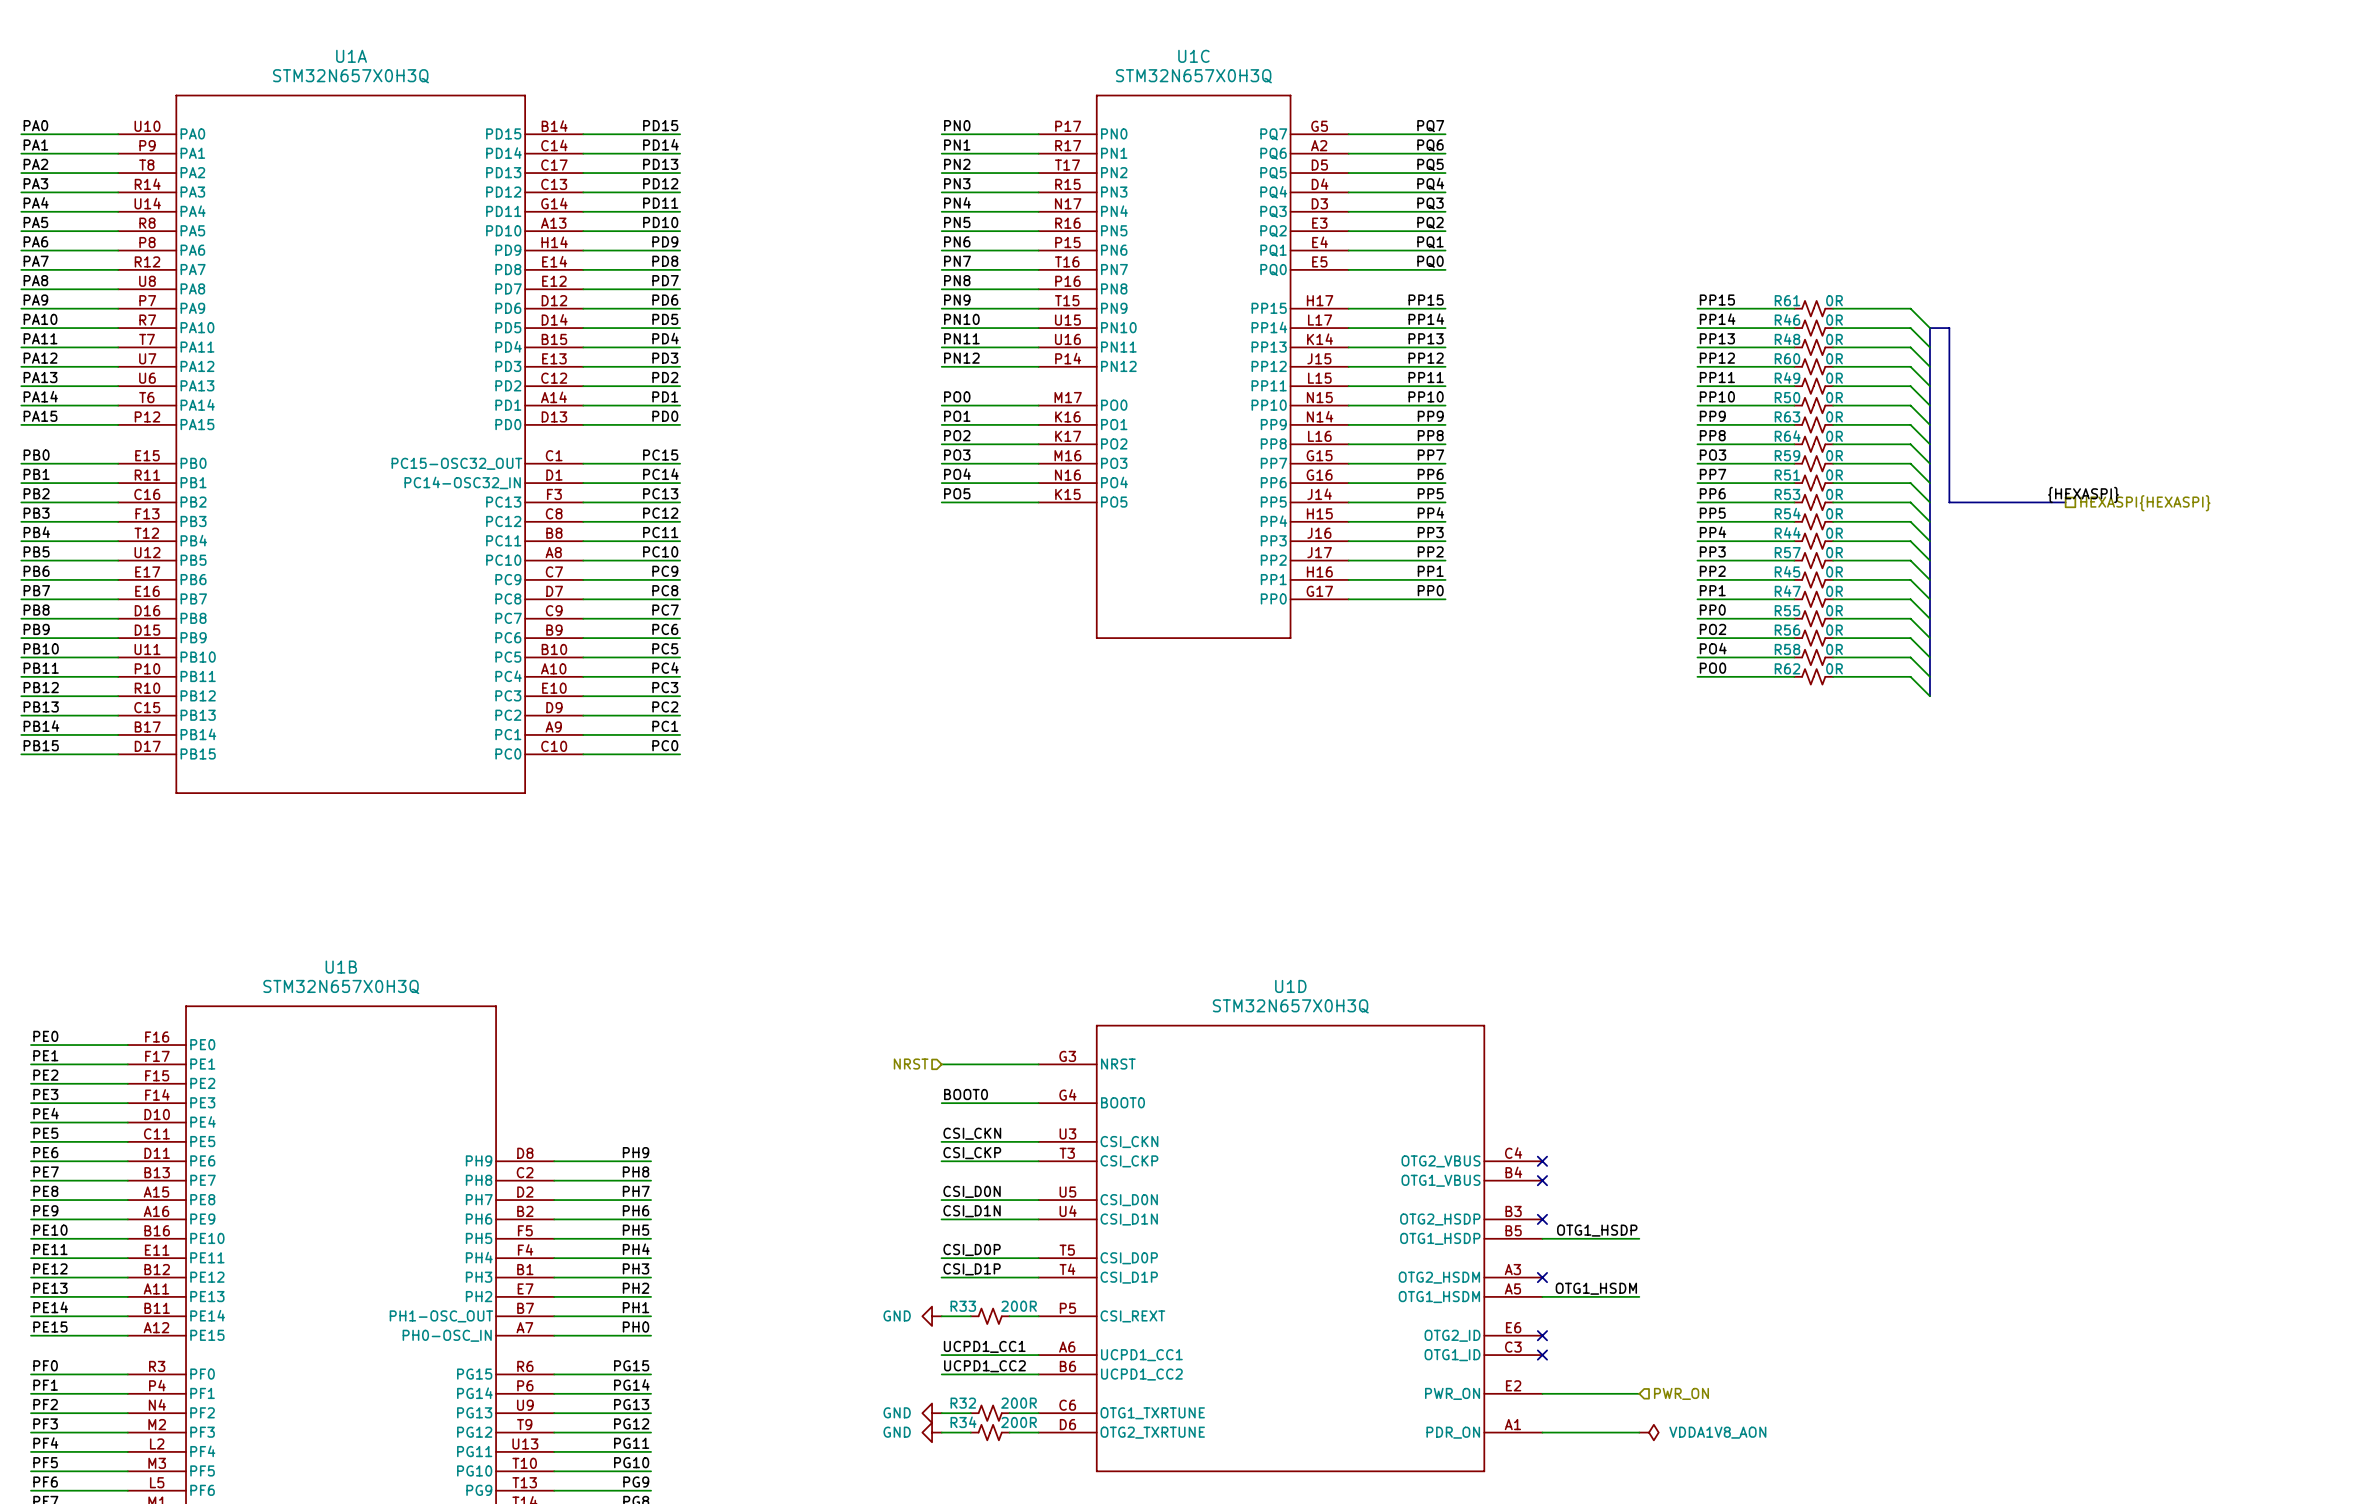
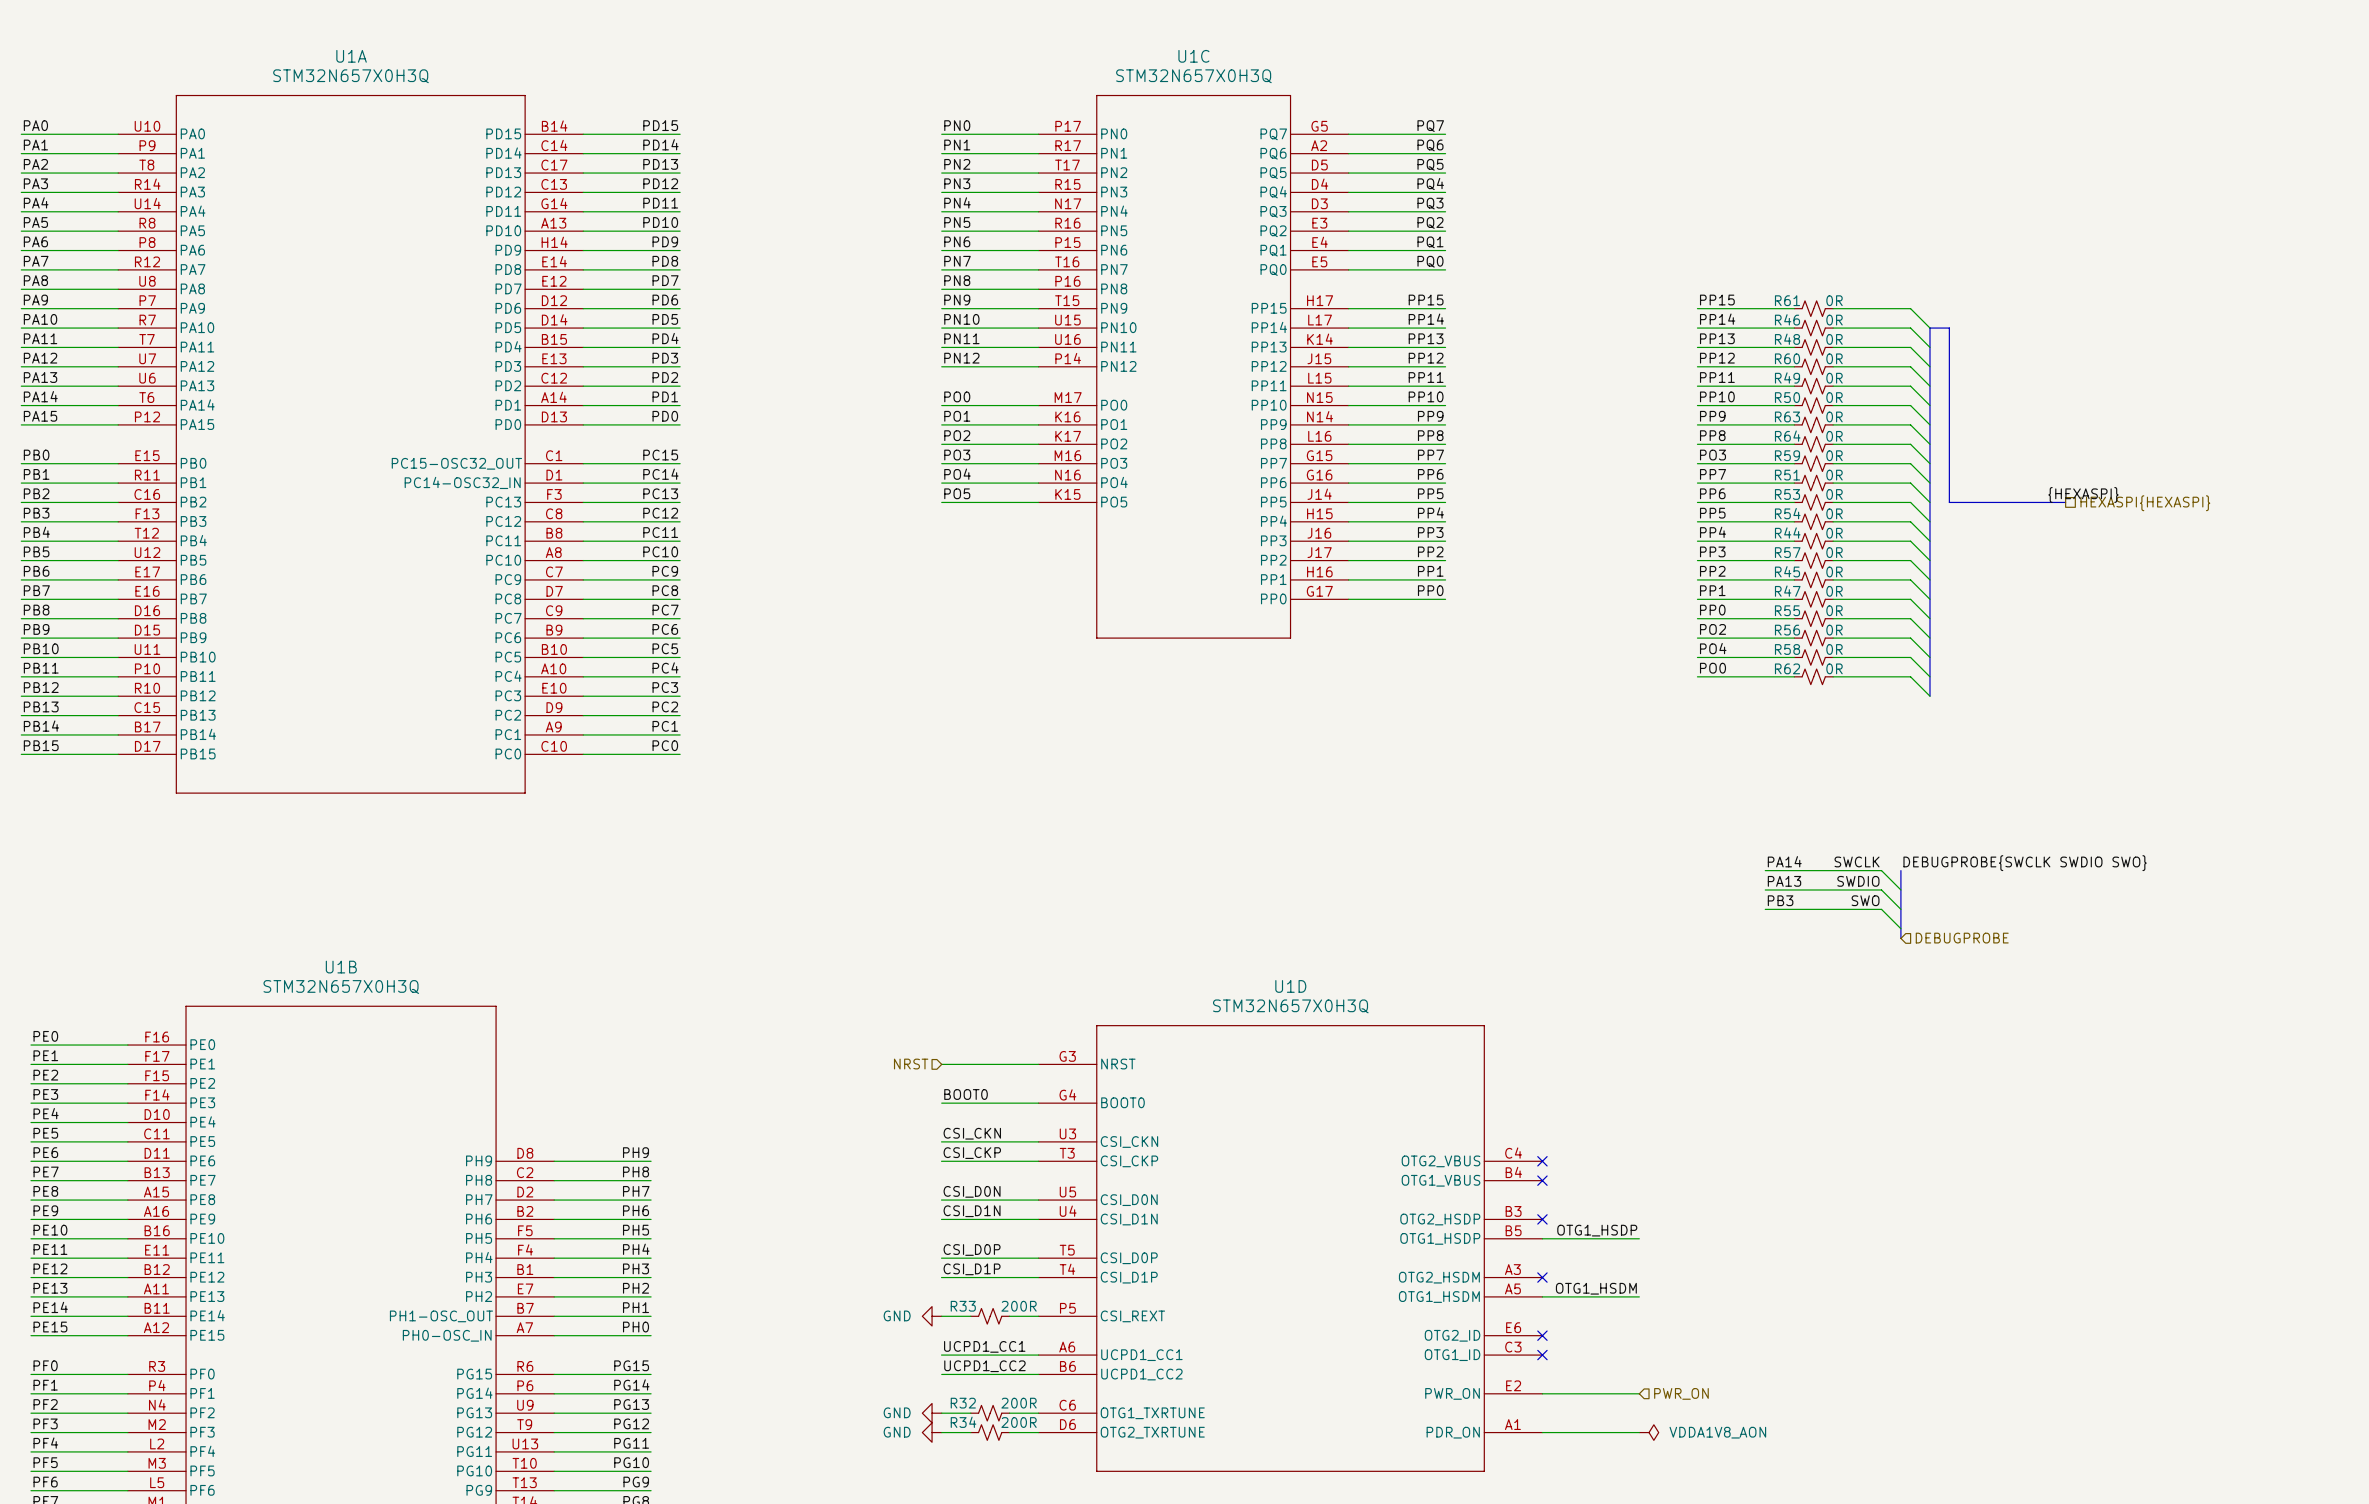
label: none -> PA14 (1784, 861)
label: none -> SWCLK (1857, 861)
label: none -> DEBUGPROBE{SWCLK SWDIO SWO} (2025, 863)
wire: none -> (1765, 870) (1881, 870) (1900, 889)
bus: none -> (1900, 870) (1900, 938)
label: none -> PA13 (1784, 881)
label: none -> SWDIO (1858, 881)
wire: none -> (1765, 889) (1881, 889) (1900, 909)
label: none -> PB3 (1780, 900)
label: none -> SWO (1865, 900)
wire: none -> (1765, 909) (1881, 909) (1900, 928)
hierarchical label: none -> DEBUGPROBE (1962, 938)

